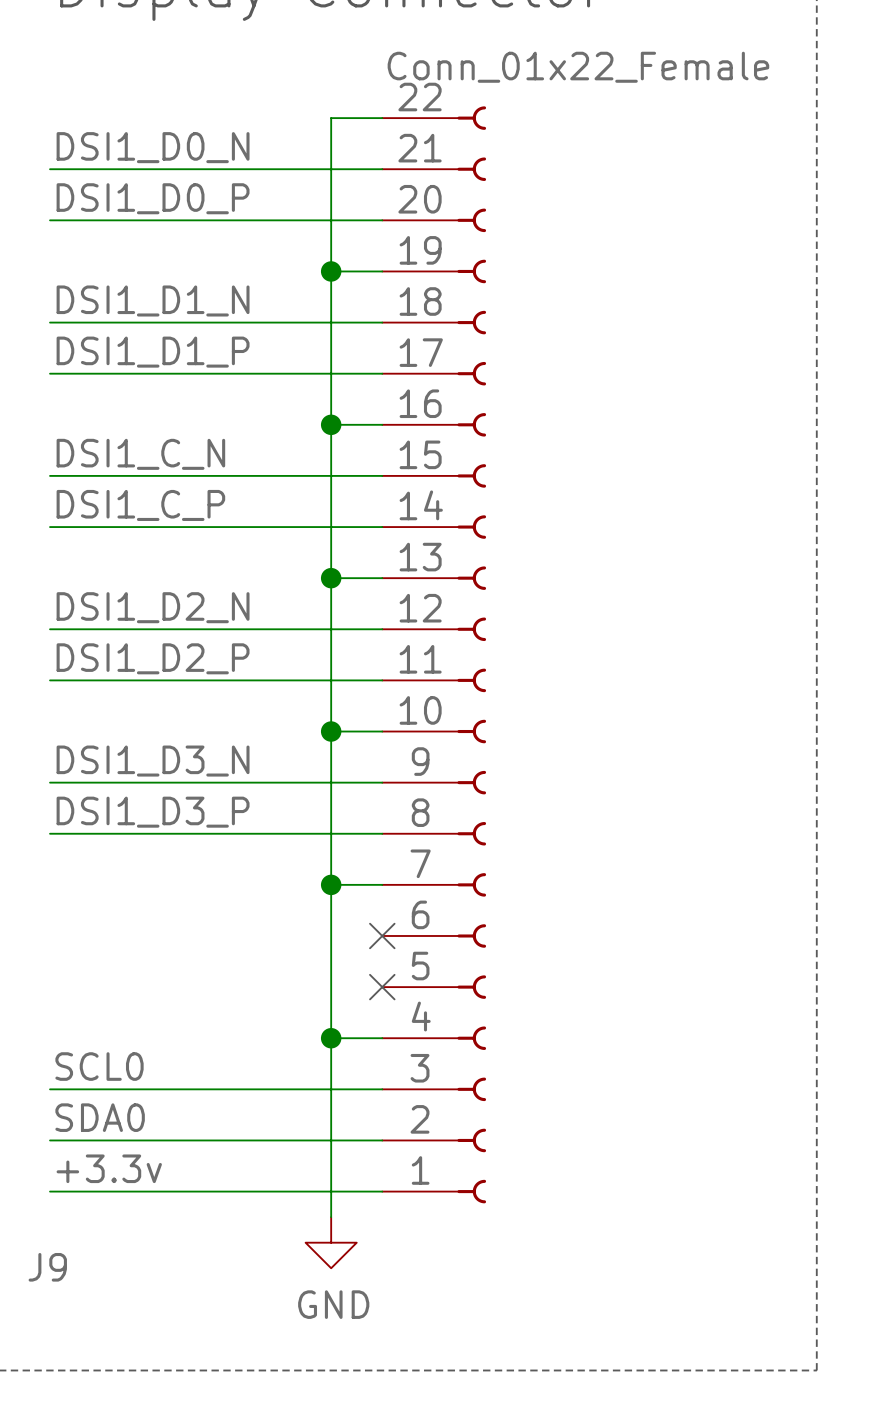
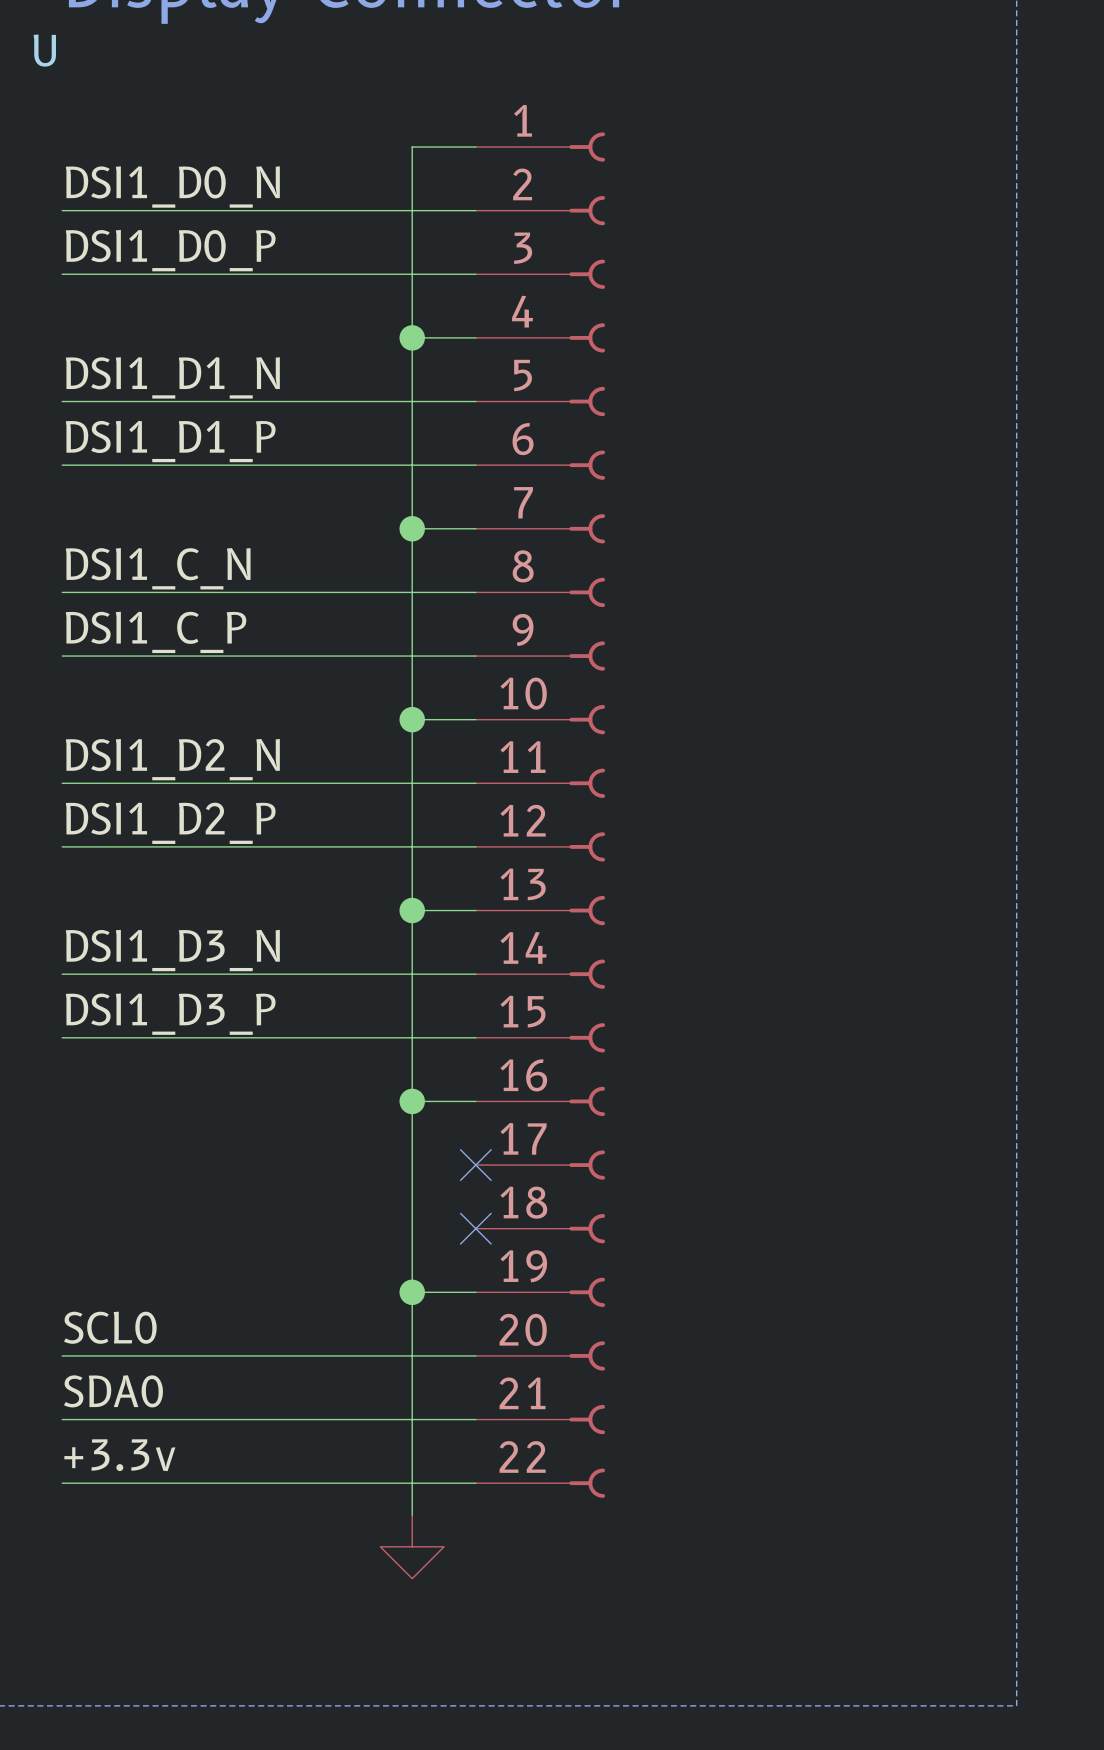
J9: Conn_01x22_Female (434, 654) -> none
U: none -> (540, 815)
power symbol text: GND (333, 1304) -> none

